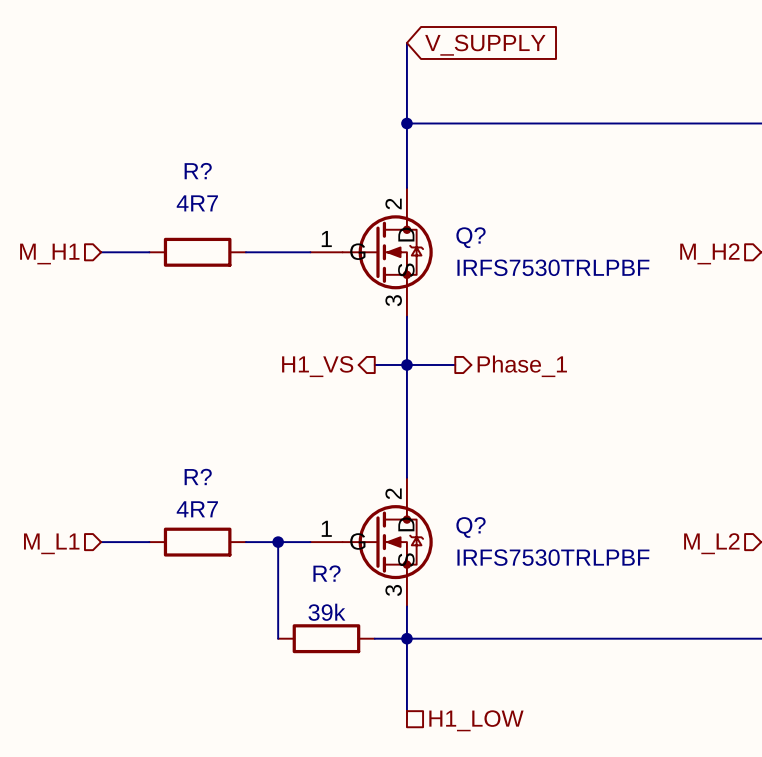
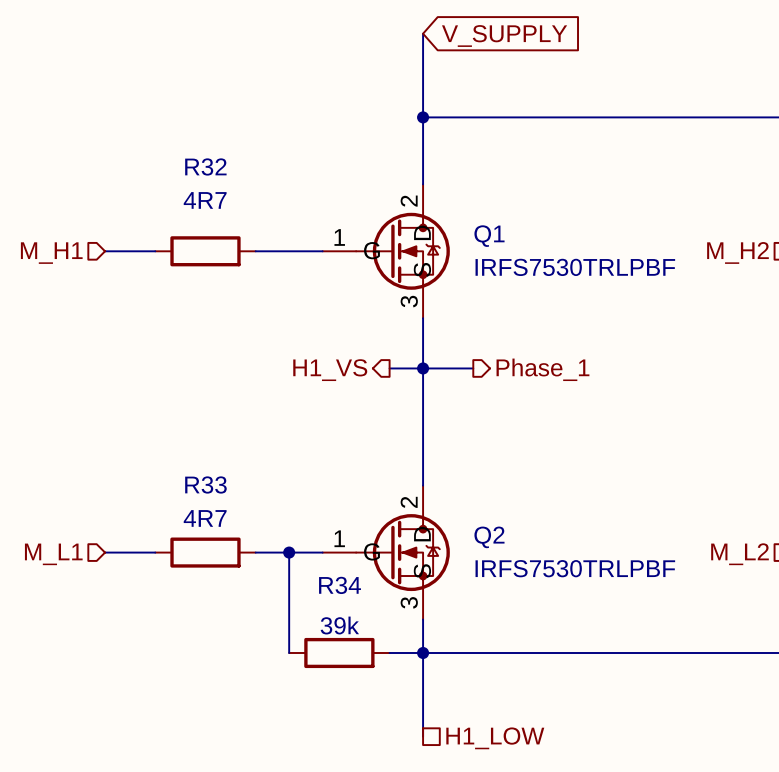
R? name: R? (198, 171) -> R32 (205, 166)
Q? name: Q? (470, 237) -> Q1 (489, 236)
R? name: R? (198, 476) -> R33 (205, 484)
Q? name: Q? (470, 527) -> Q2 (489, 537)
R? name: R? (326, 573) -> R34 (340, 585)

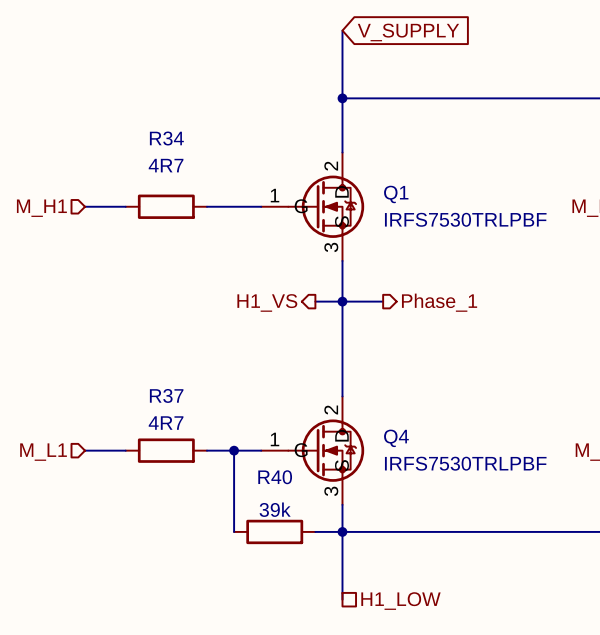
R32 name: R32 (205, 166) -> R34 (166, 138)
R33 name: R33 (205, 484) -> R37 (166, 395)
Q2 name: Q2 (489, 537) -> Q4 (396, 438)
R34 name: R34 (340, 585) -> R40 (275, 477)

